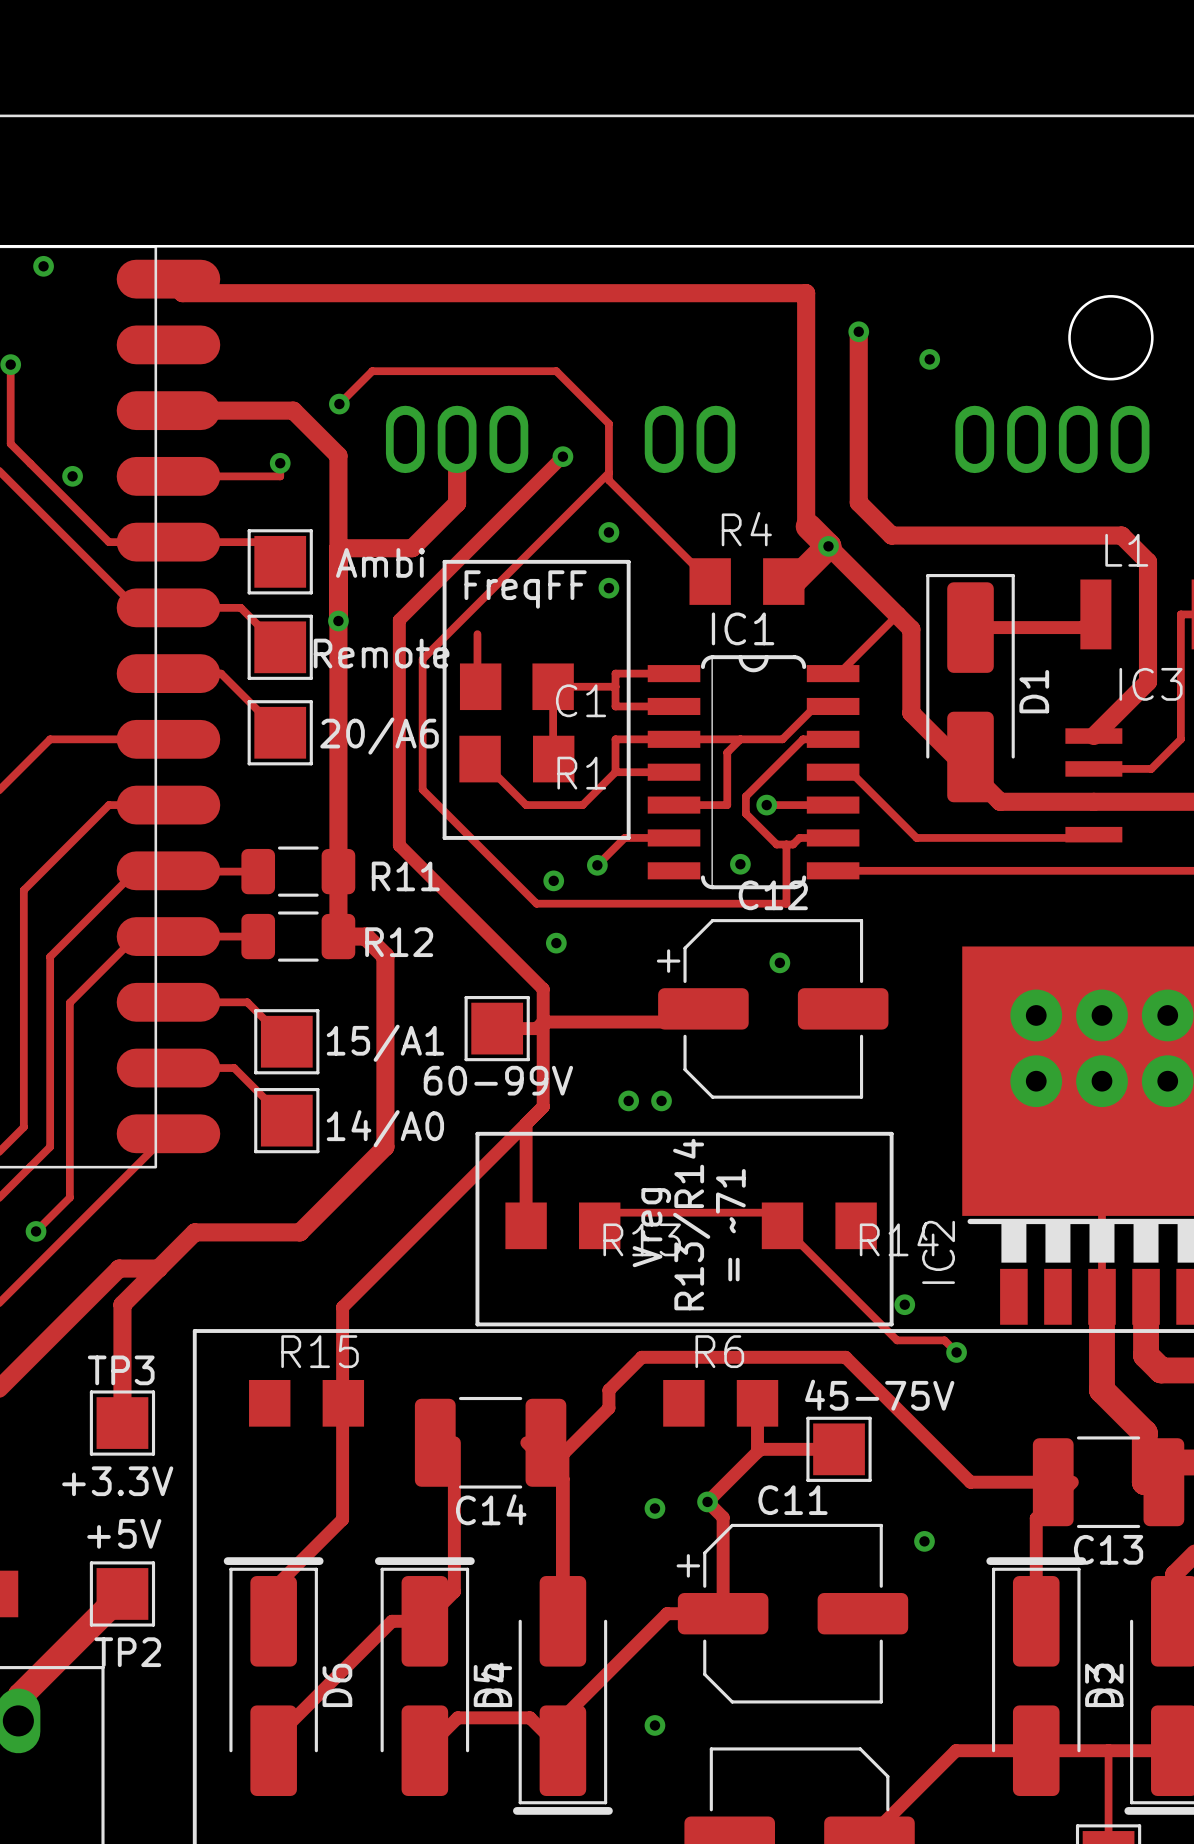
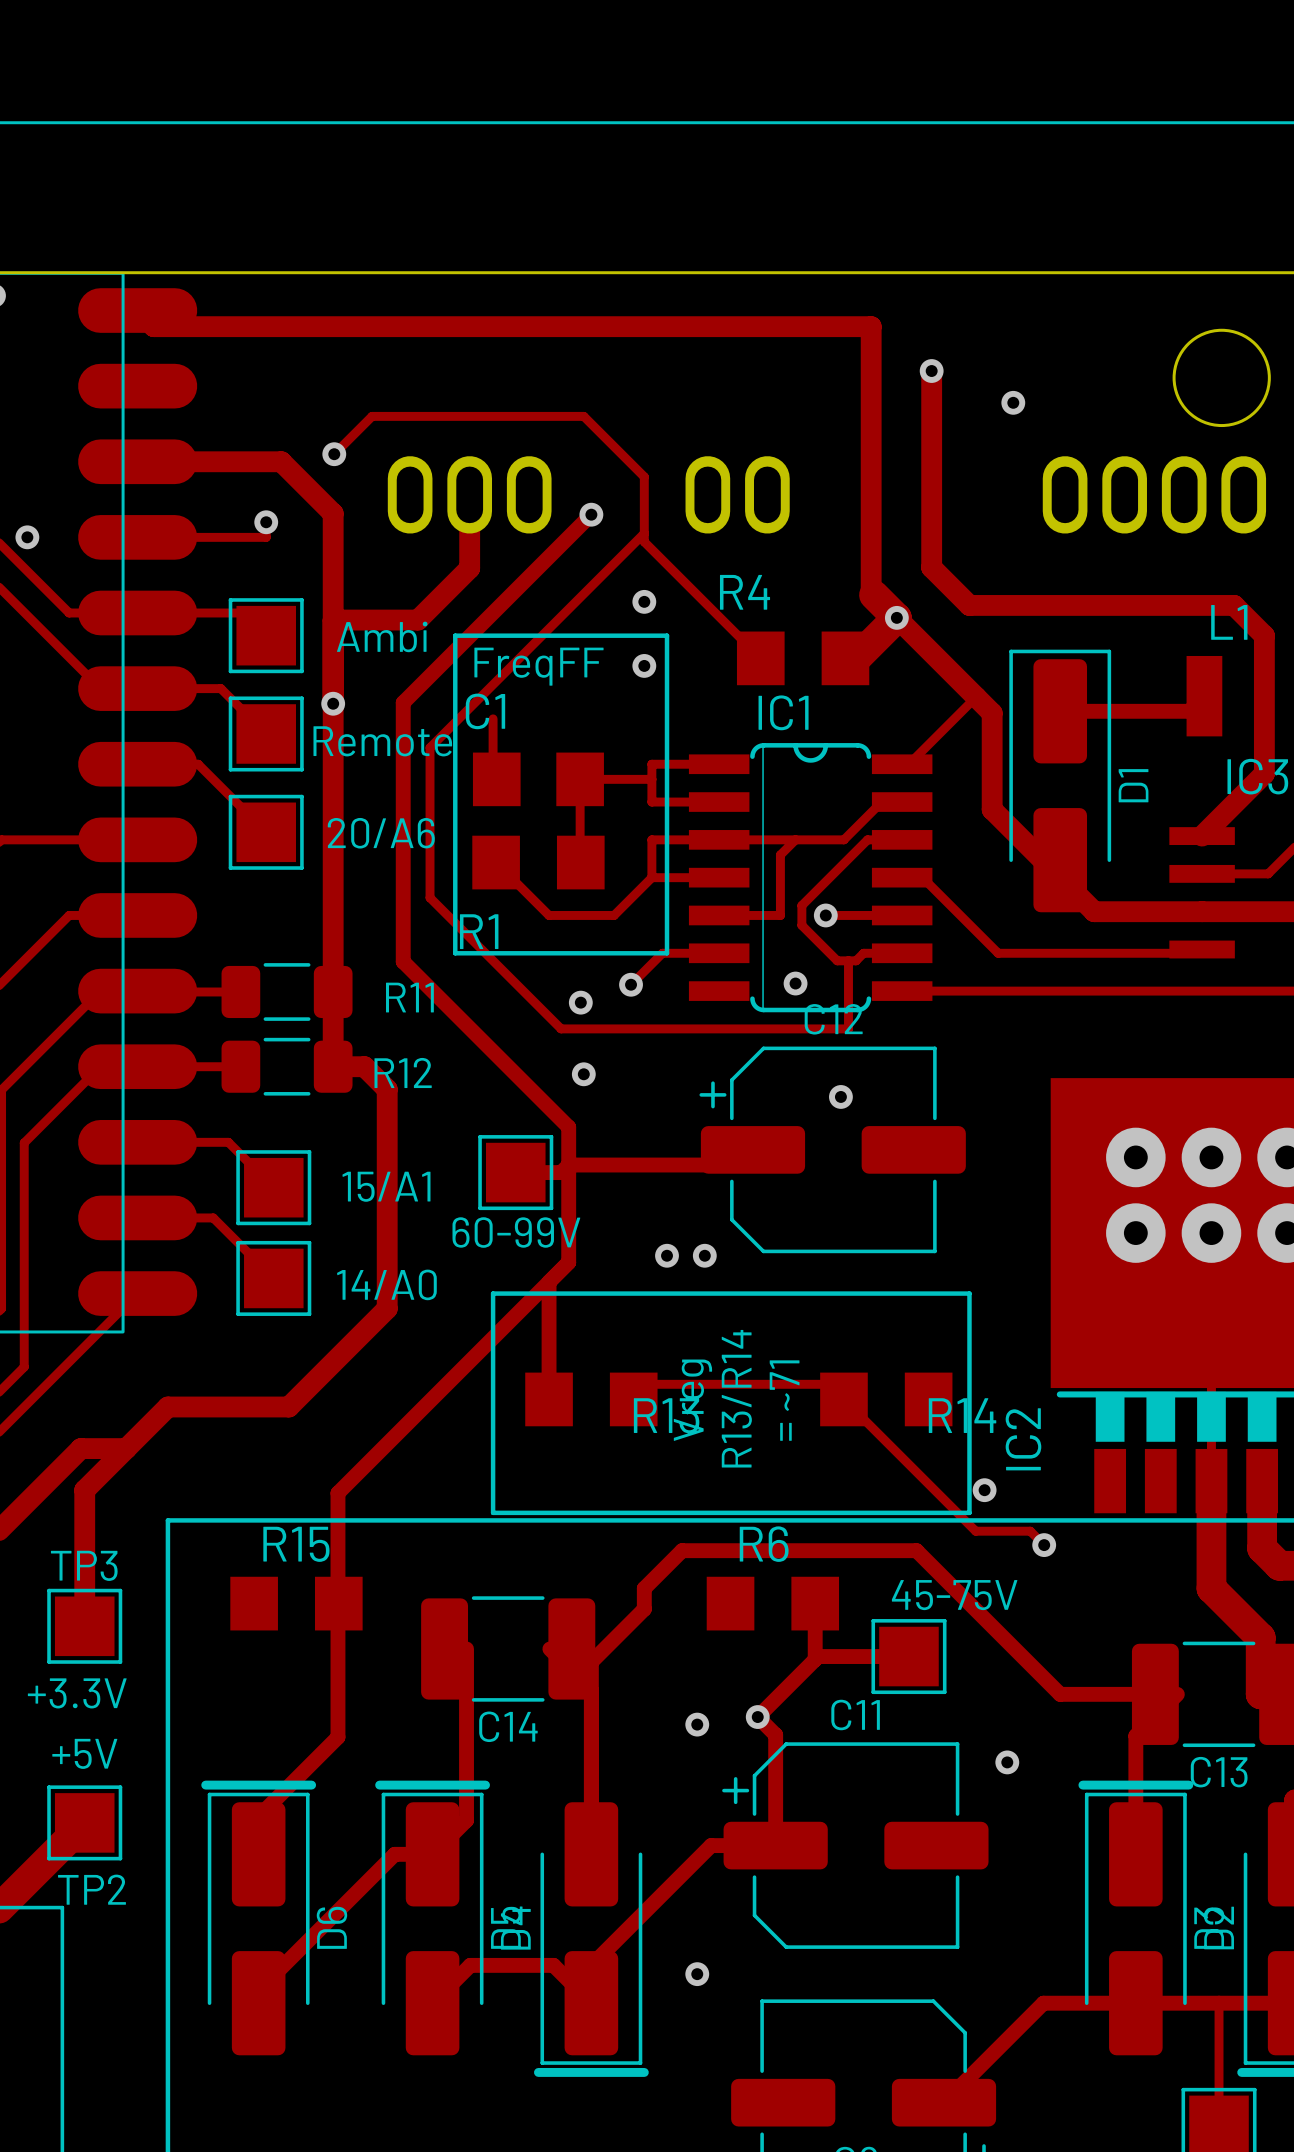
R4 name position: R4 (746, 529) -> R4 (745, 592)
C1 name position: C1 (581, 700) -> C1 (485, 711)
R1 name position: R1 (581, 773) -> R1 (479, 931)

